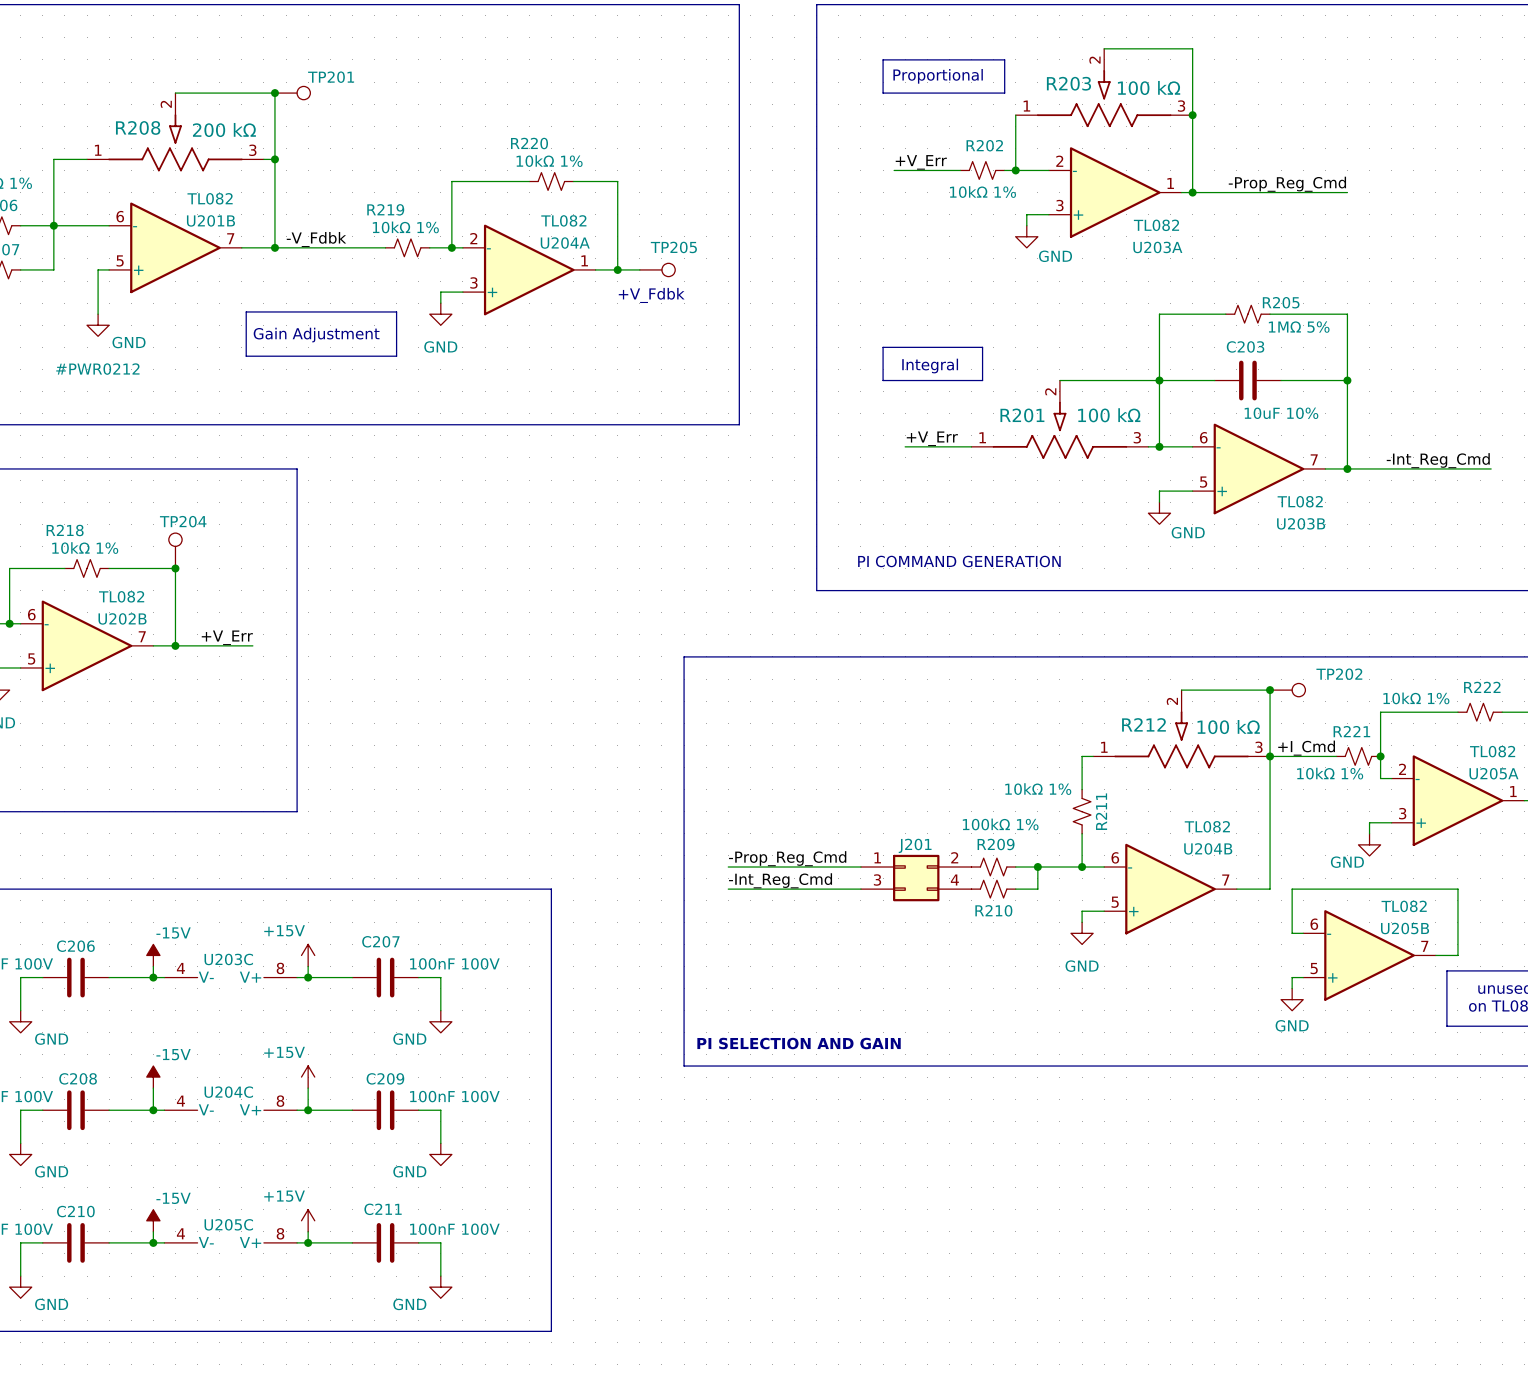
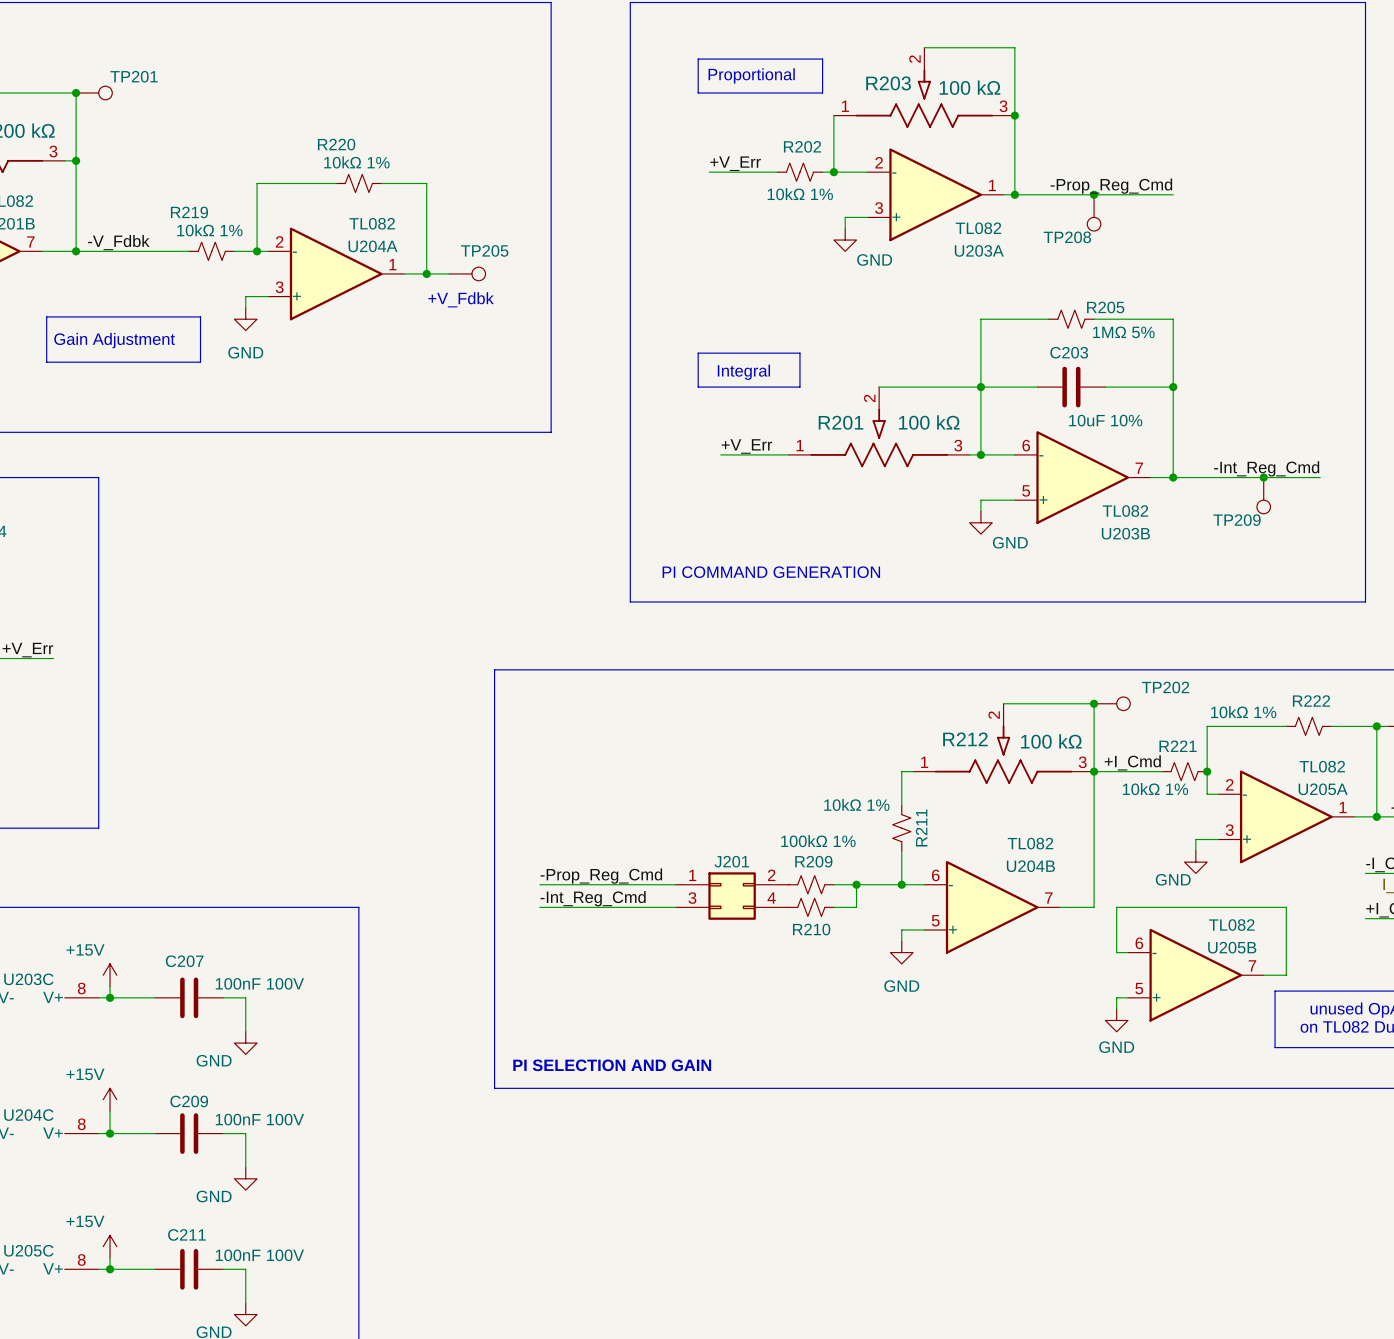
junction: none -> (1094, 194)
TP208: none -> (1094, 212)
junction: none -> (1263, 477)
TP209: none -> (1263, 495)

